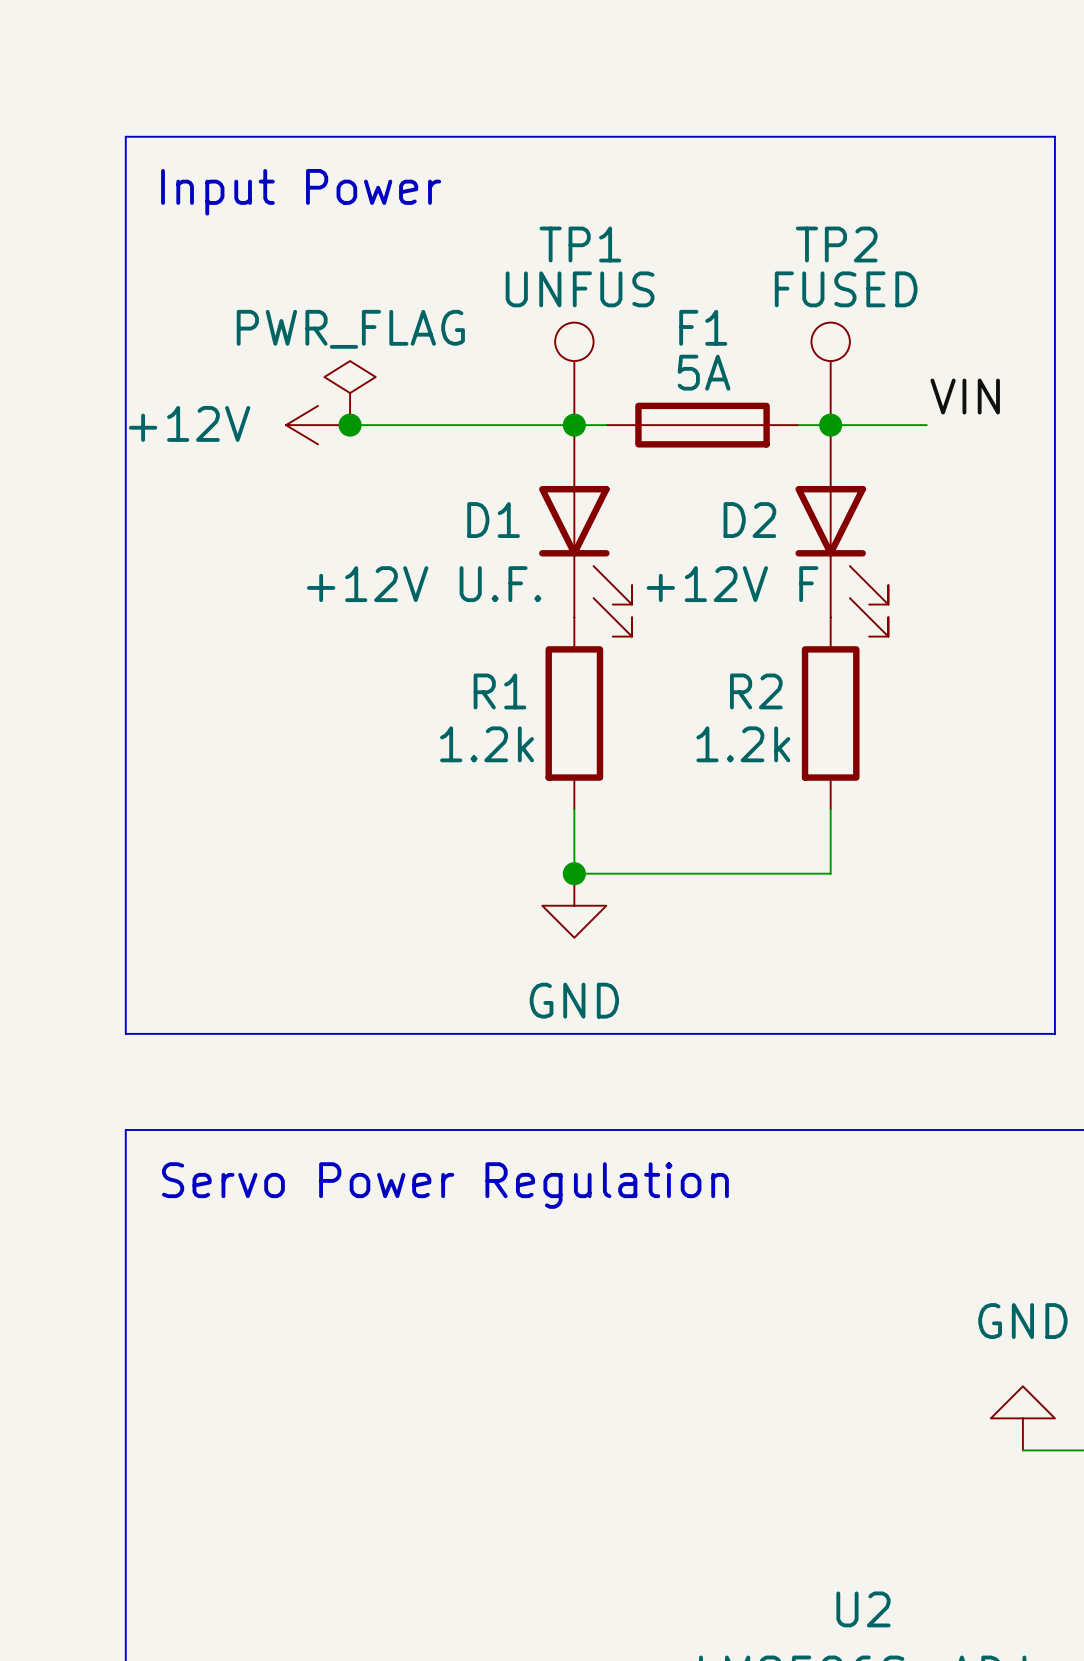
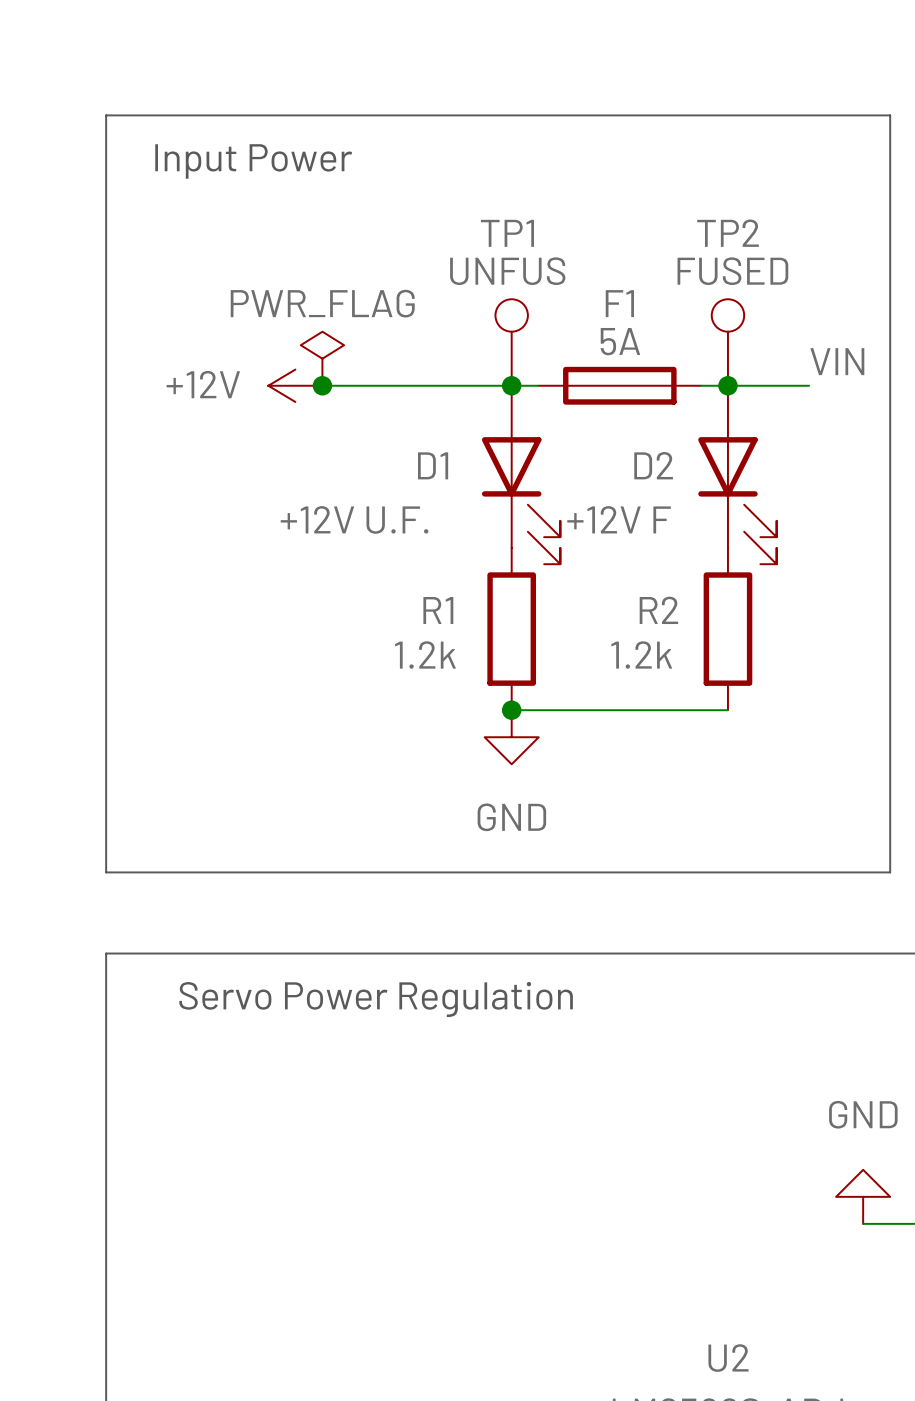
TP1 position: (574, 373) -> (511, 342)
TP2 position: (830, 373) -> (727, 342)
power symbol position: PWR_FLAG (350, 393) -> PWR_FLAG (322, 358)
label position: VIN (965, 396) -> VIN (837, 361)
power symbol position: +12V (318, 425) -> +12V (295, 385)
wire: (350, 425) (606, 425) -> (322, 385) (538, 385)
junction position: (350, 425) -> (322, 385)
junction position: (574, 425) -> (511, 385)
F1 position: (702, 425) -> (619, 385)
wire: (798, 425) (926, 425) -> (700, 385) (809, 385)
junction position: (830, 425) -> (727, 385)
D1 position: (585, 530) -> (521, 474)
D2 position: (841, 530) -> (737, 474)
R1 position: (574, 713) -> (511, 629)
R2 position: (830, 713) -> (727, 629)
wire: (574, 809) (574, 873) (830, 873) (830, 809) -> none
wire: none -> (511, 710) (727, 710)
junction position: (574, 873) -> (511, 710)
power symbol position: GND (574, 905) -> GND (511, 737)

